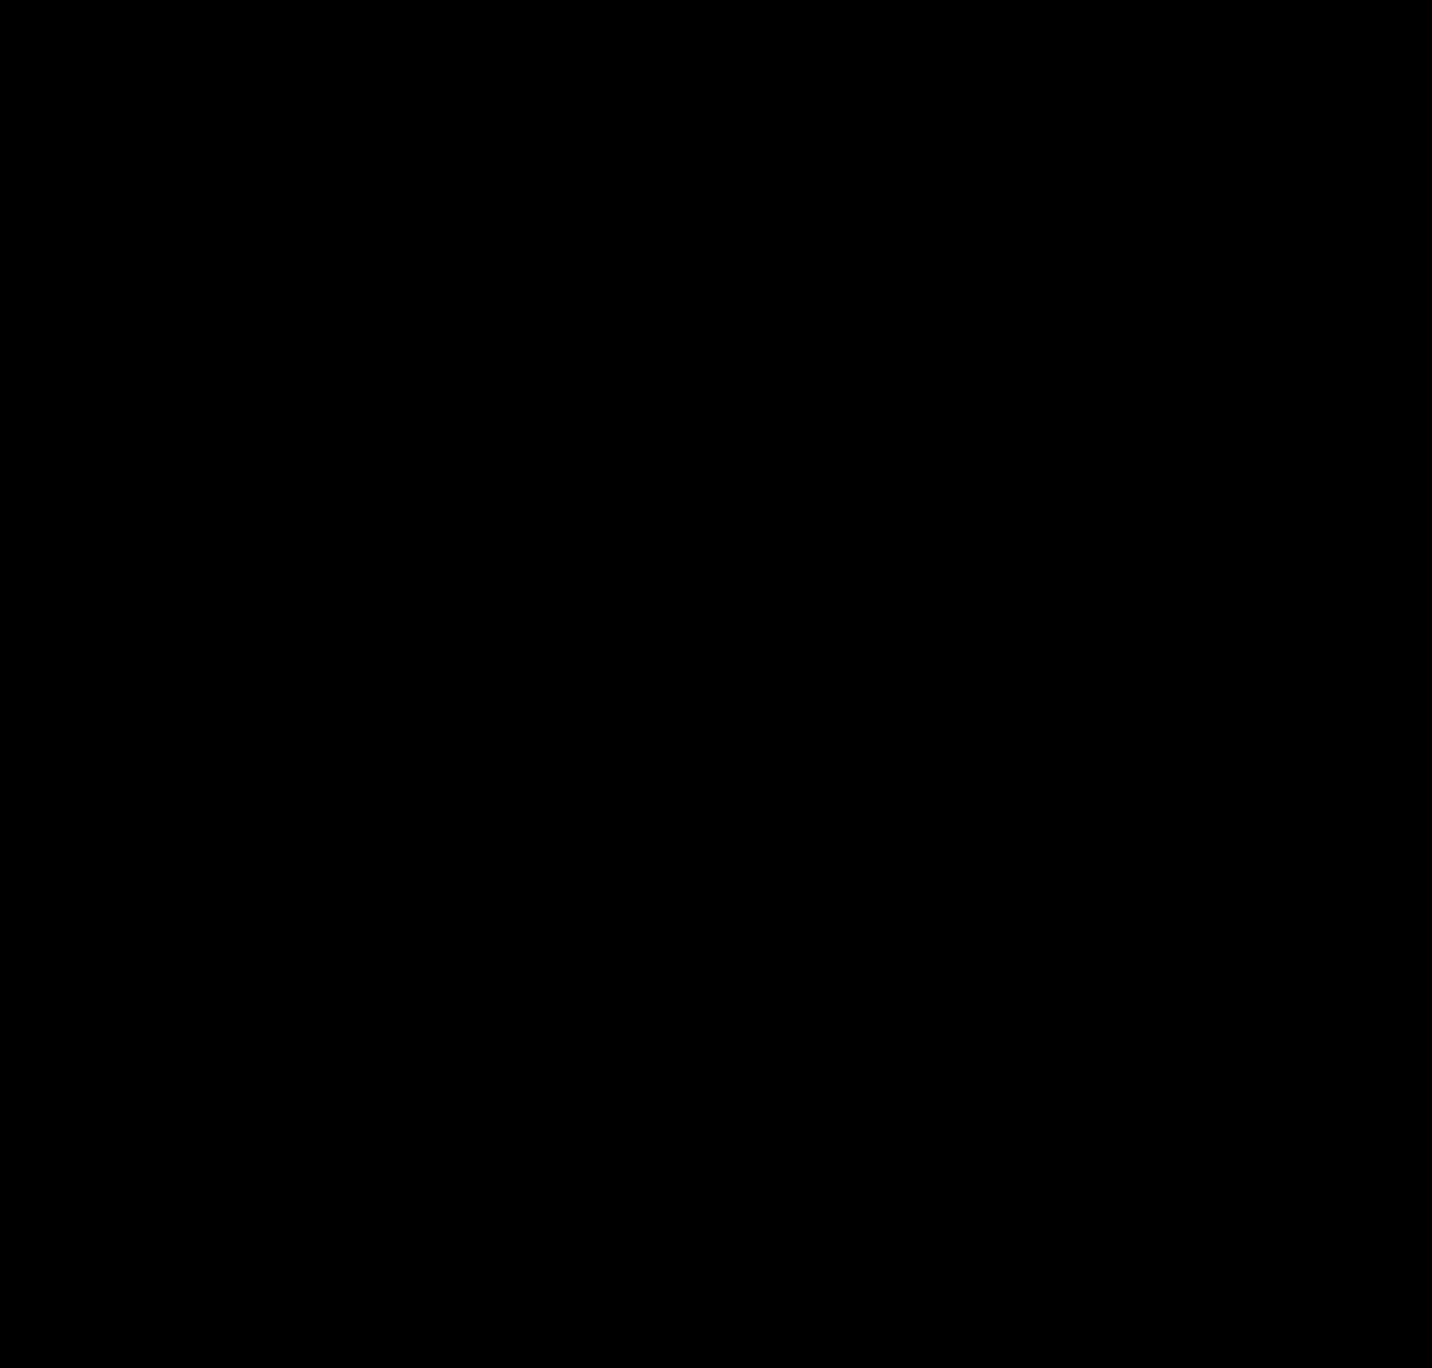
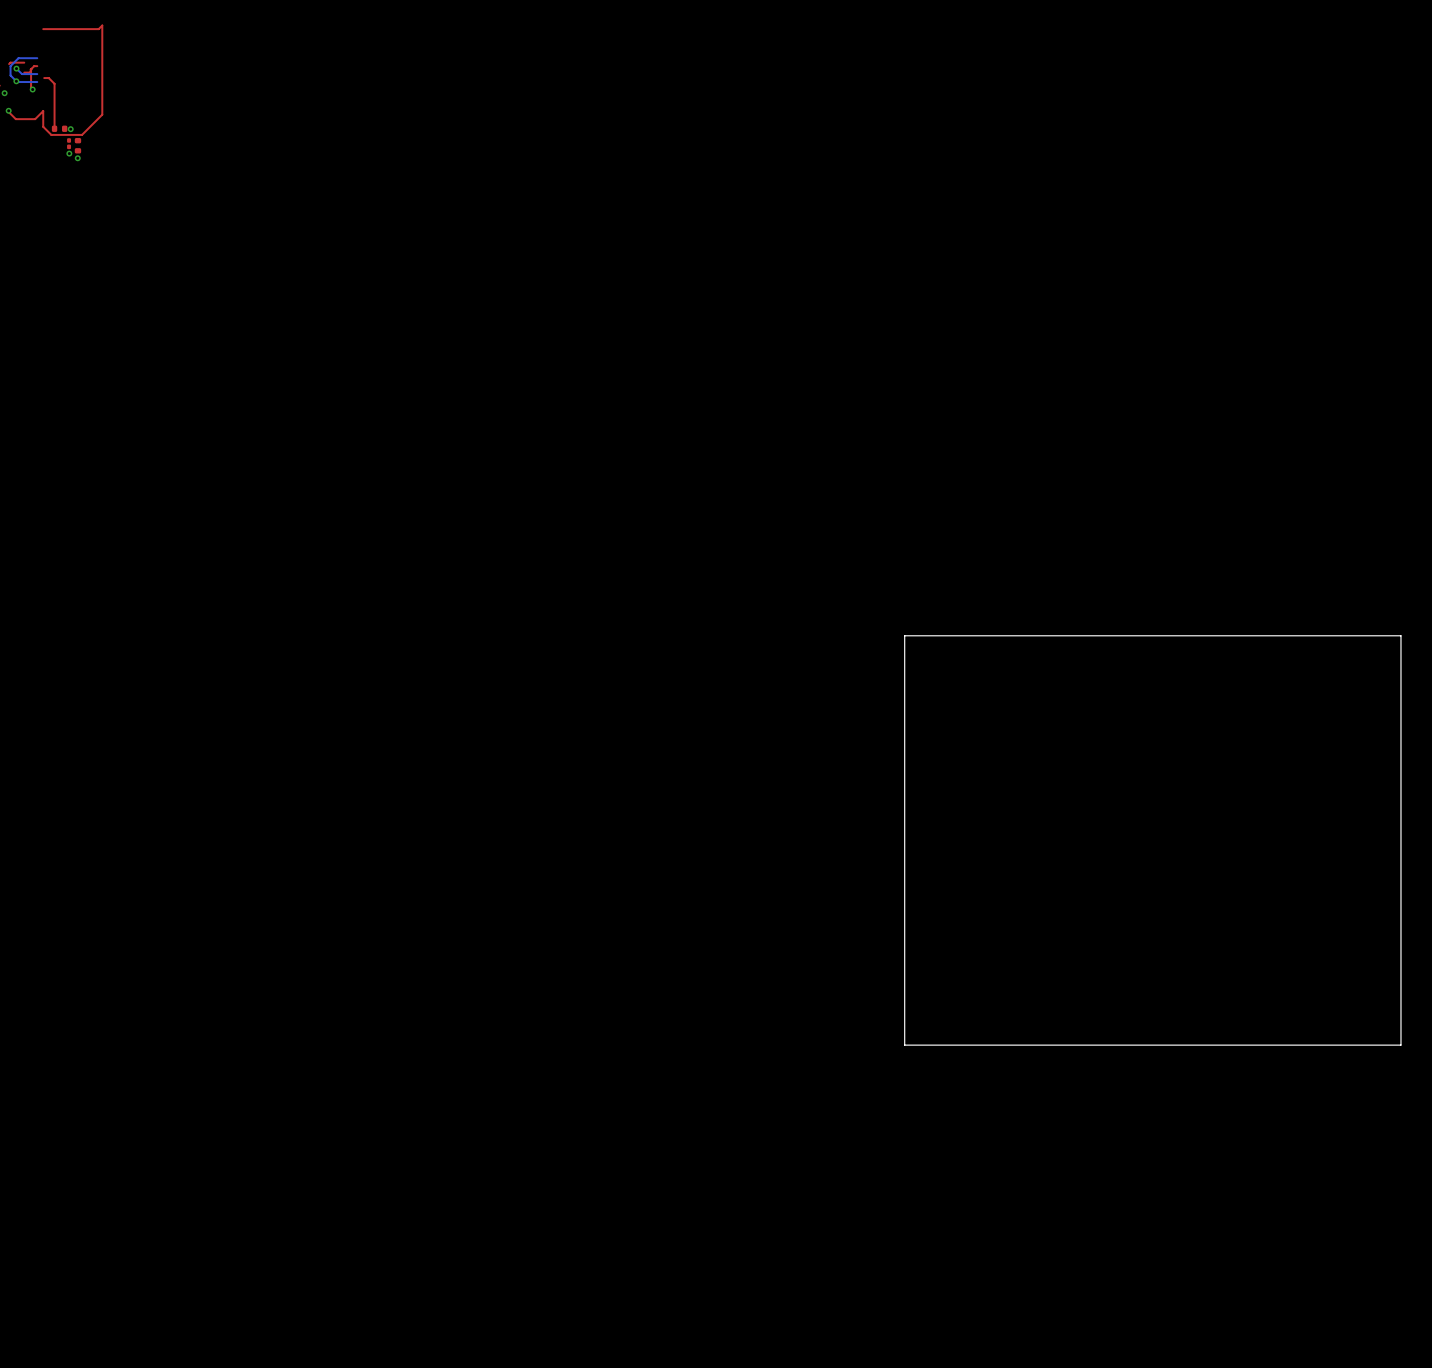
top track: none -> (43, 29) (98, 29) (102, 25) (102, 114) (82, 134) (51, 134) (43, 126) (43, 111) (35, 119) (15, 119) (8, 110)
bottom track: none -> (37, 58) (18, 58) (10, 66) (10, 75) (17, 82) (37, 82)
top track: none -> (24, 62) (9, 64)
top track: none -> (37, 66) (34, 66) (30, 72) (24, 72)
bottom track: none -> (16, 68) (21, 74) (37, 74)
via: none -> (16, 68)
top track: none -> (31, 69) (32, 89)
top track: none -> (44, 78) (48, 78) (54, 83) (54, 128)
via: none -> (16, 81)
via: none -> (32, 89)
via: none -> (4, 93)
via: none -> (8, 110)
part: none -> (59, 128)
via: none -> (70, 129)
part: none -> (69, 143)
part: none -> (77, 145)
via: none -> (69, 153)
via: none -> (77, 158)
board edge: none -> (1400, 635) (904, 635) (904, 1045) (1400, 1045) (1400, 635)

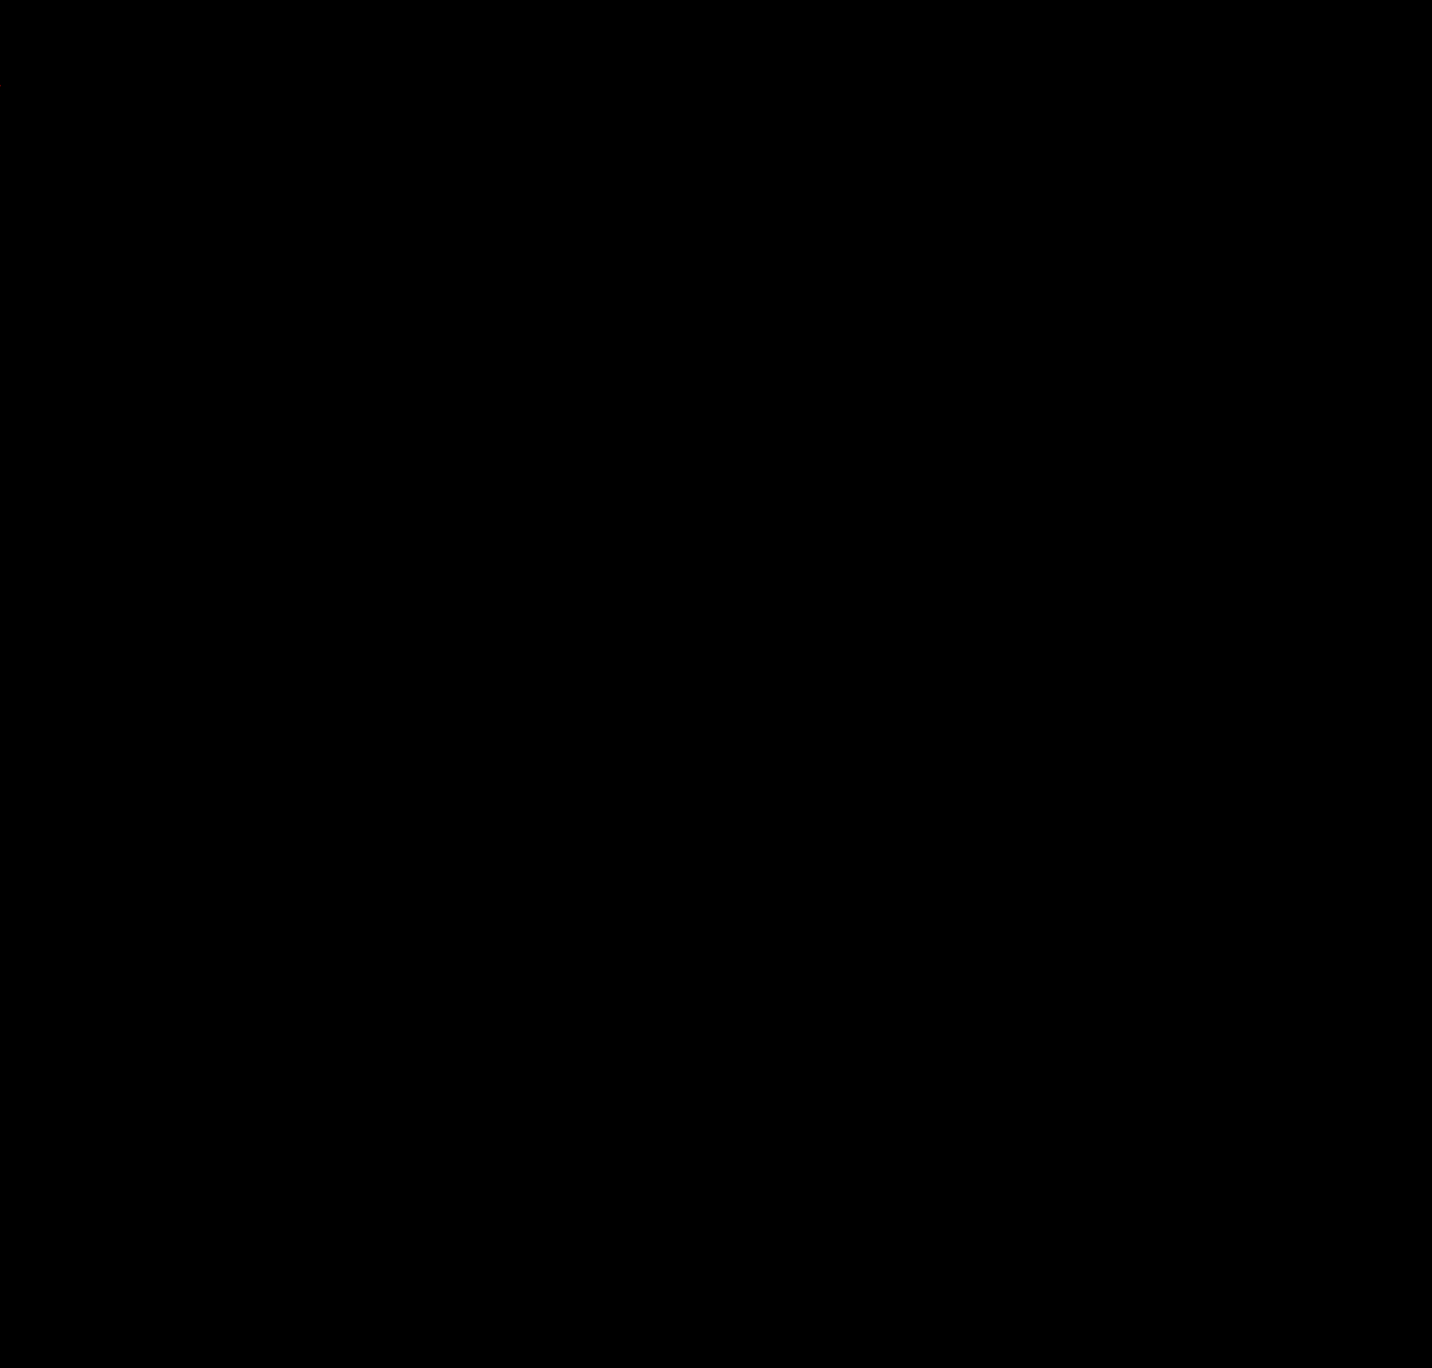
top track: (43, 29) (98, 29) (102, 25) (102, 114) (82, 134) (51, 134) (43, 126) (43, 111) (35, 119) (15, 119) (8, 110) -> none
bottom track: (37, 58) (18, 58) (10, 66) (10, 75) (17, 82) (37, 82) -> none
top track: (24, 62) (9, 64) -> none
top track: (37, 66) (34, 66) (30, 72) (24, 72) -> none
bottom track: (16, 68) (21, 74) (37, 74) -> none
via: (16, 68) -> none
top track: (31, 69) (32, 89) -> none
top track: (44, 78) (48, 78) (54, 83) (54, 128) -> none
via: (16, 81) -> none
via: (32, 89) -> none
via: (4, 93) -> none
via: (8, 110) -> none
part: (59, 128) -> none
via: (70, 129) -> none
part: (69, 143) -> none
part: (77, 145) -> none
via: (69, 153) -> none
via: (77, 158) -> none
board edge: (1400, 635) (904, 635) (904, 1045) (1400, 1045) (1400, 635) -> none

